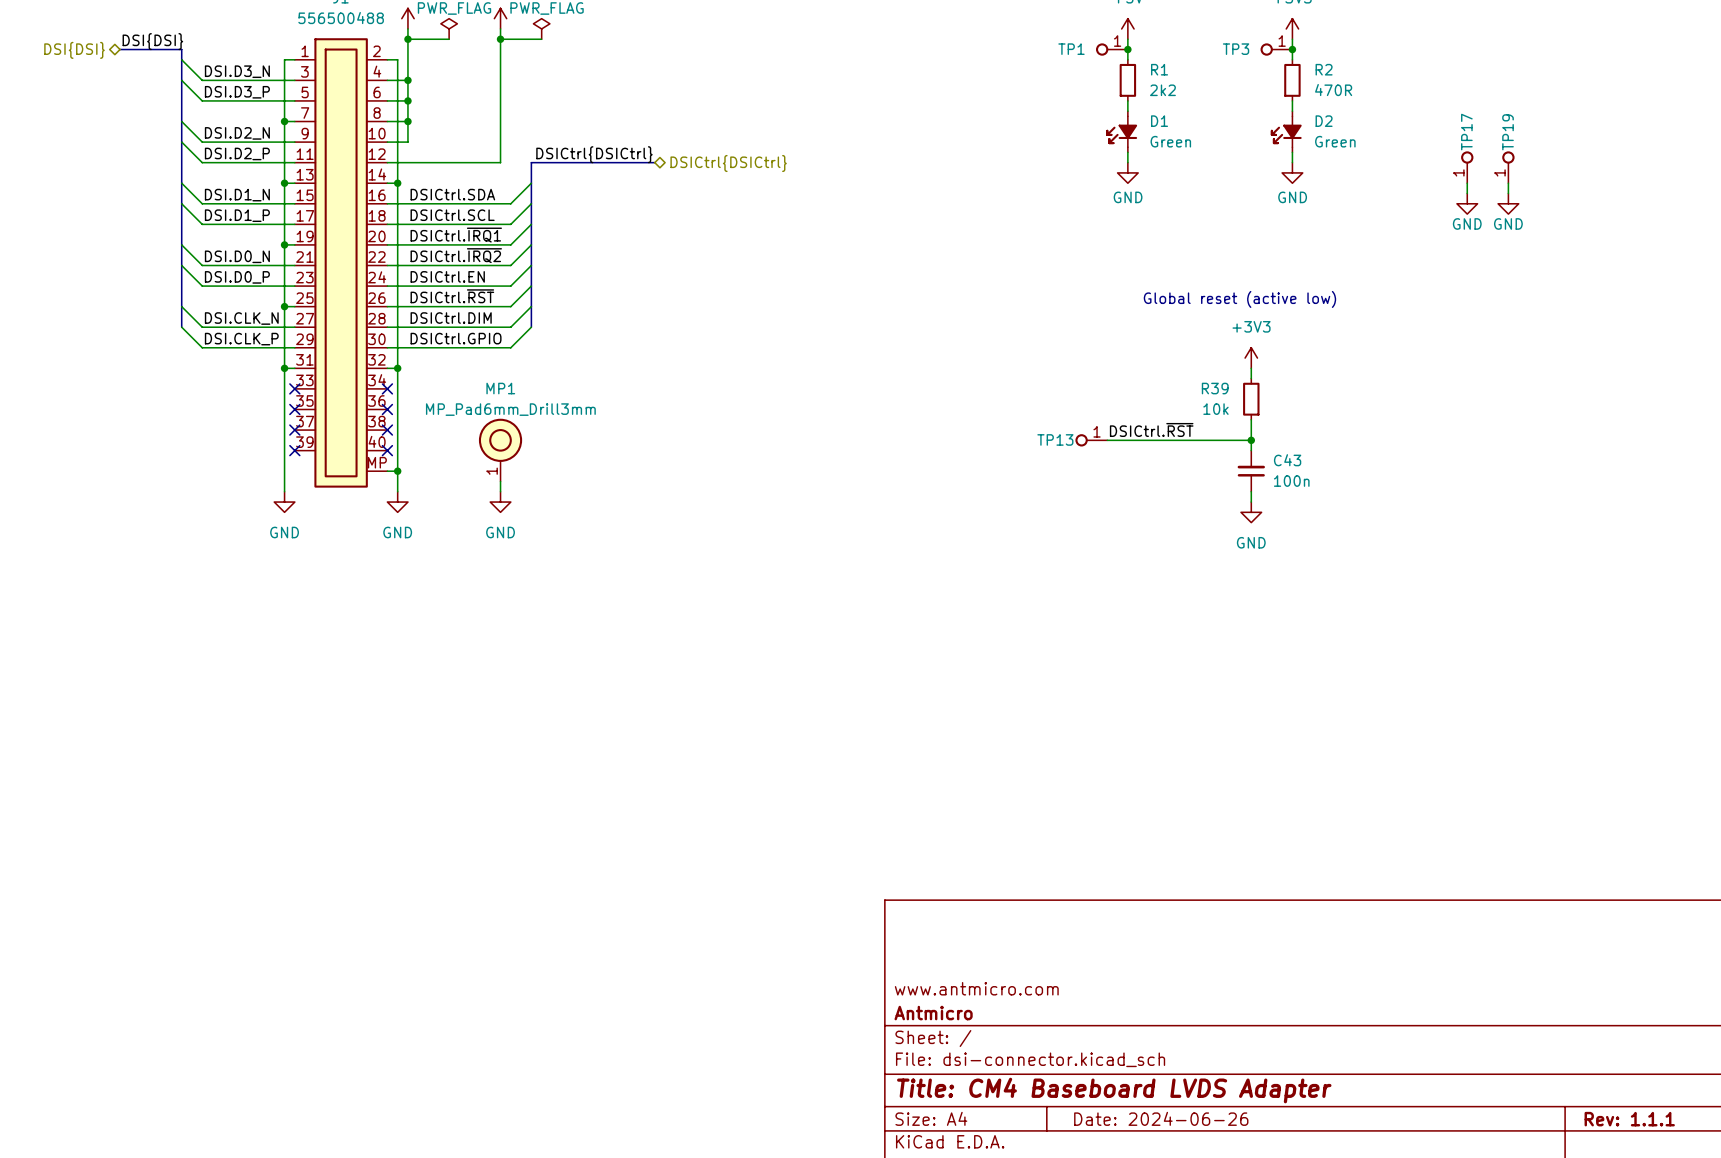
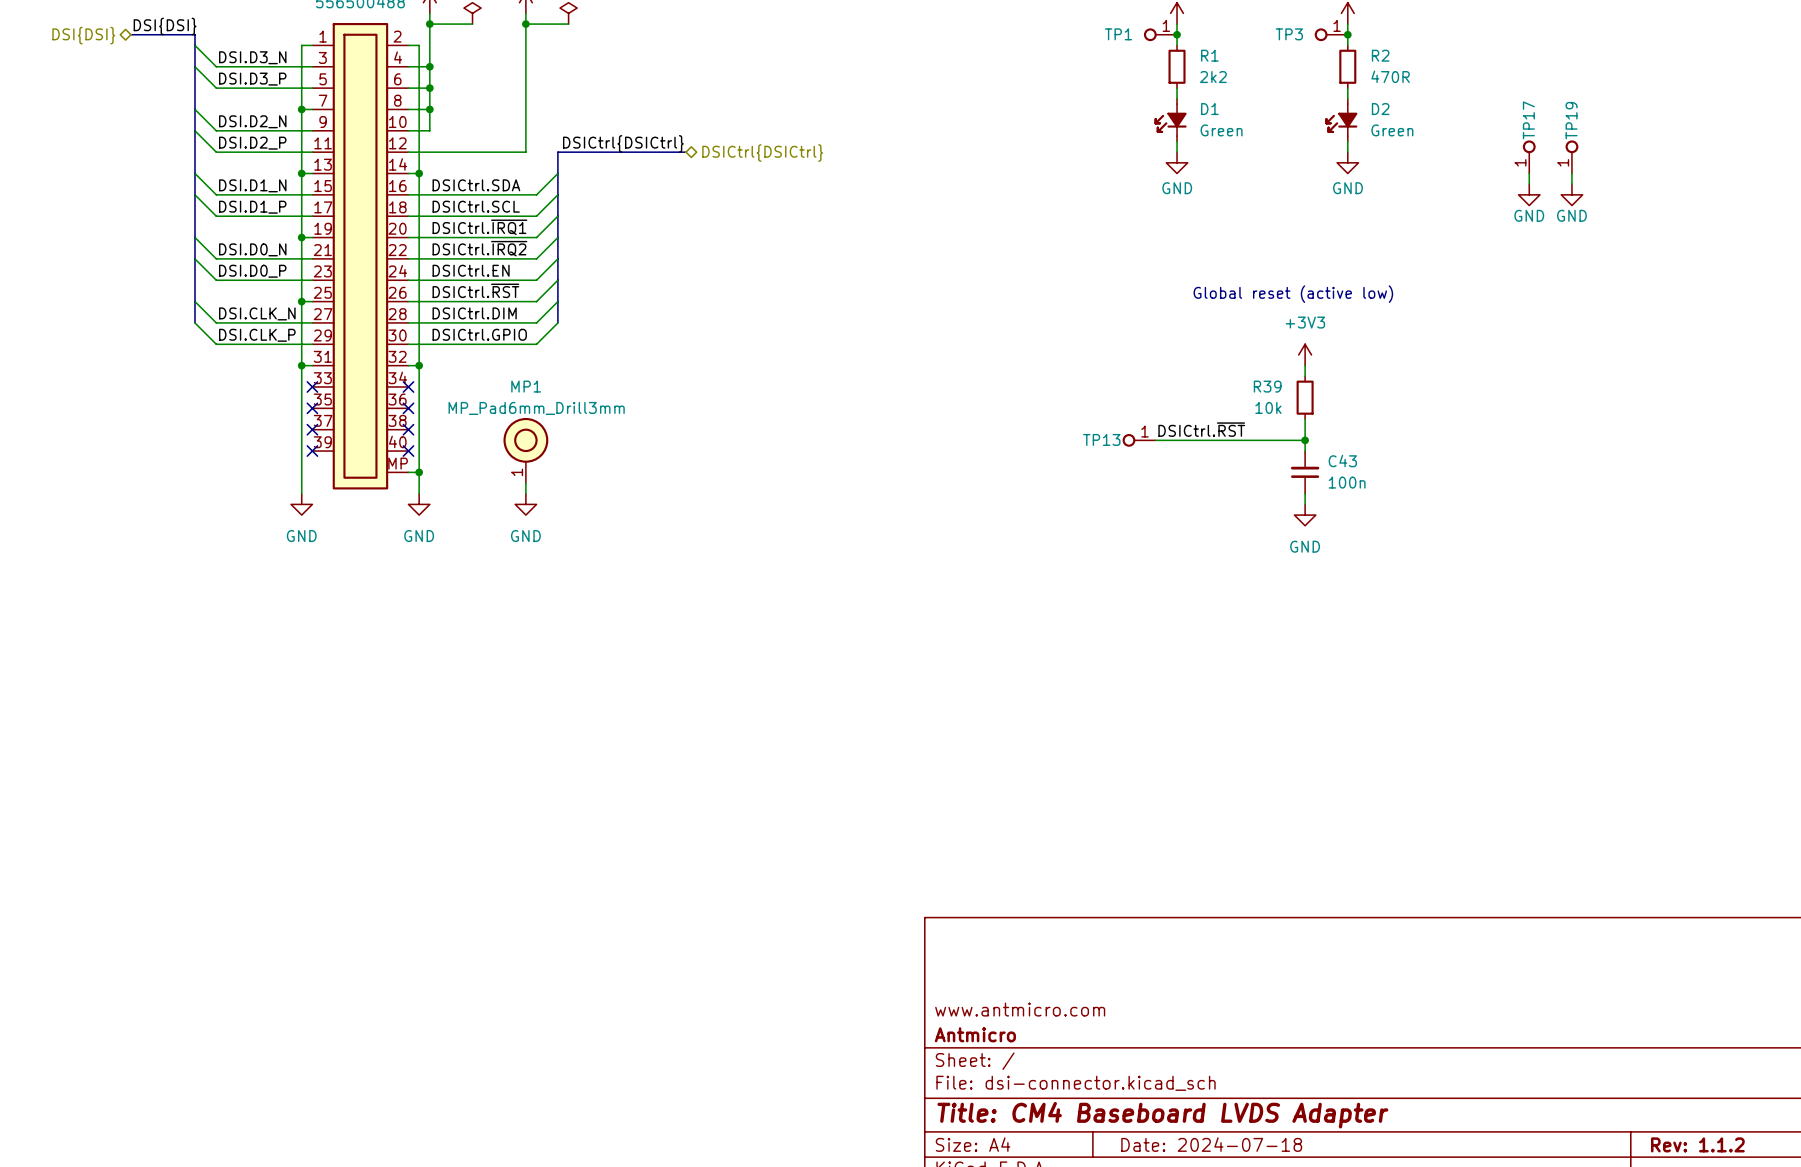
title block: Date: 2024-06-26 (1161, 1118) -> Date: 2024-07-18 (1211, 1144)
title block: Rev: 1.1.1 (1629, 1119) -> Rev: 1.1.2 (1697, 1144)

